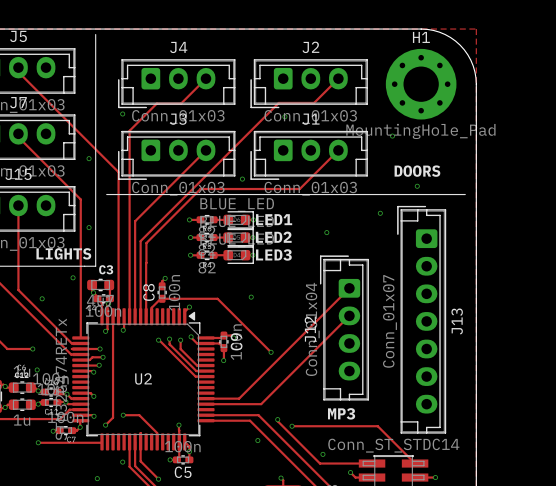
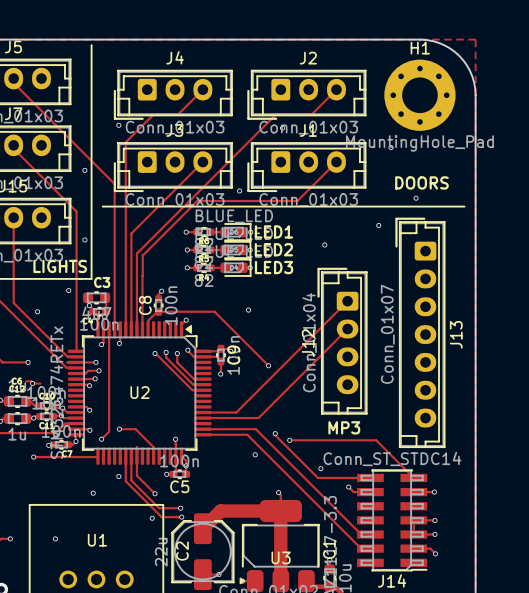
track: none -> (26, 381) (40, 383)
via: (38, 390) -> none

